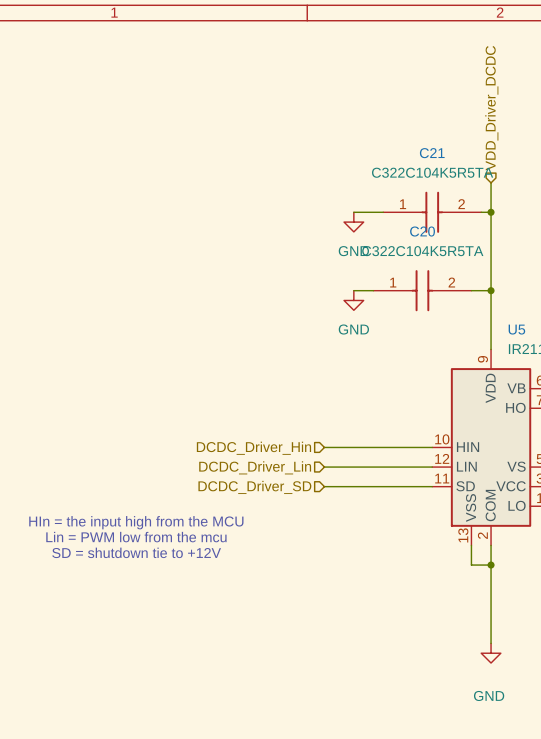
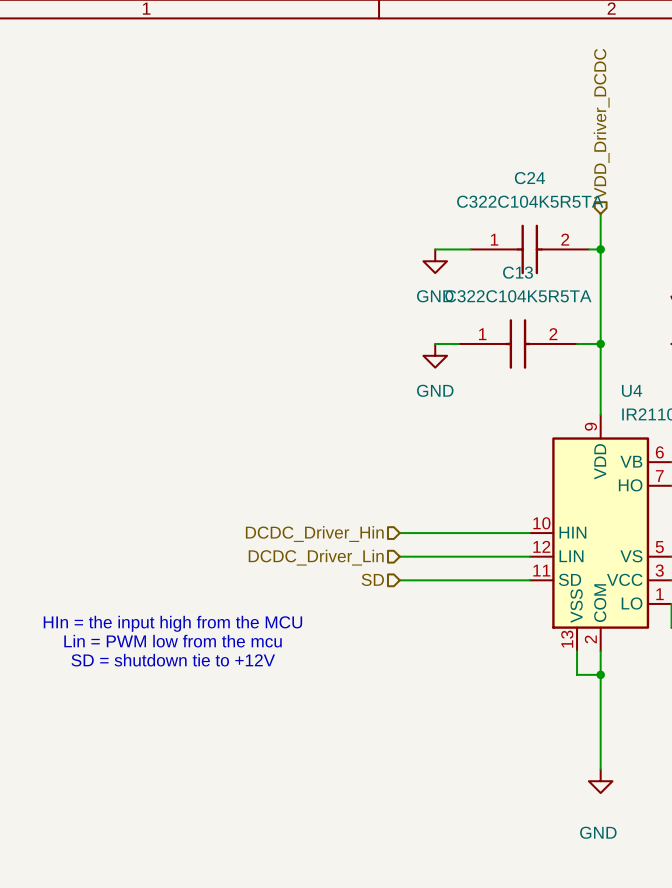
C21 name: C21 (432, 153) -> C24 (529, 178)
C20 name: C20 (422, 231) -> C13 (518, 272)
U5 name: U5 (516, 329) -> U4 (632, 390)
hierarchical label: DCDC_Driver_SD (254, 487) -> SD (372, 579)

